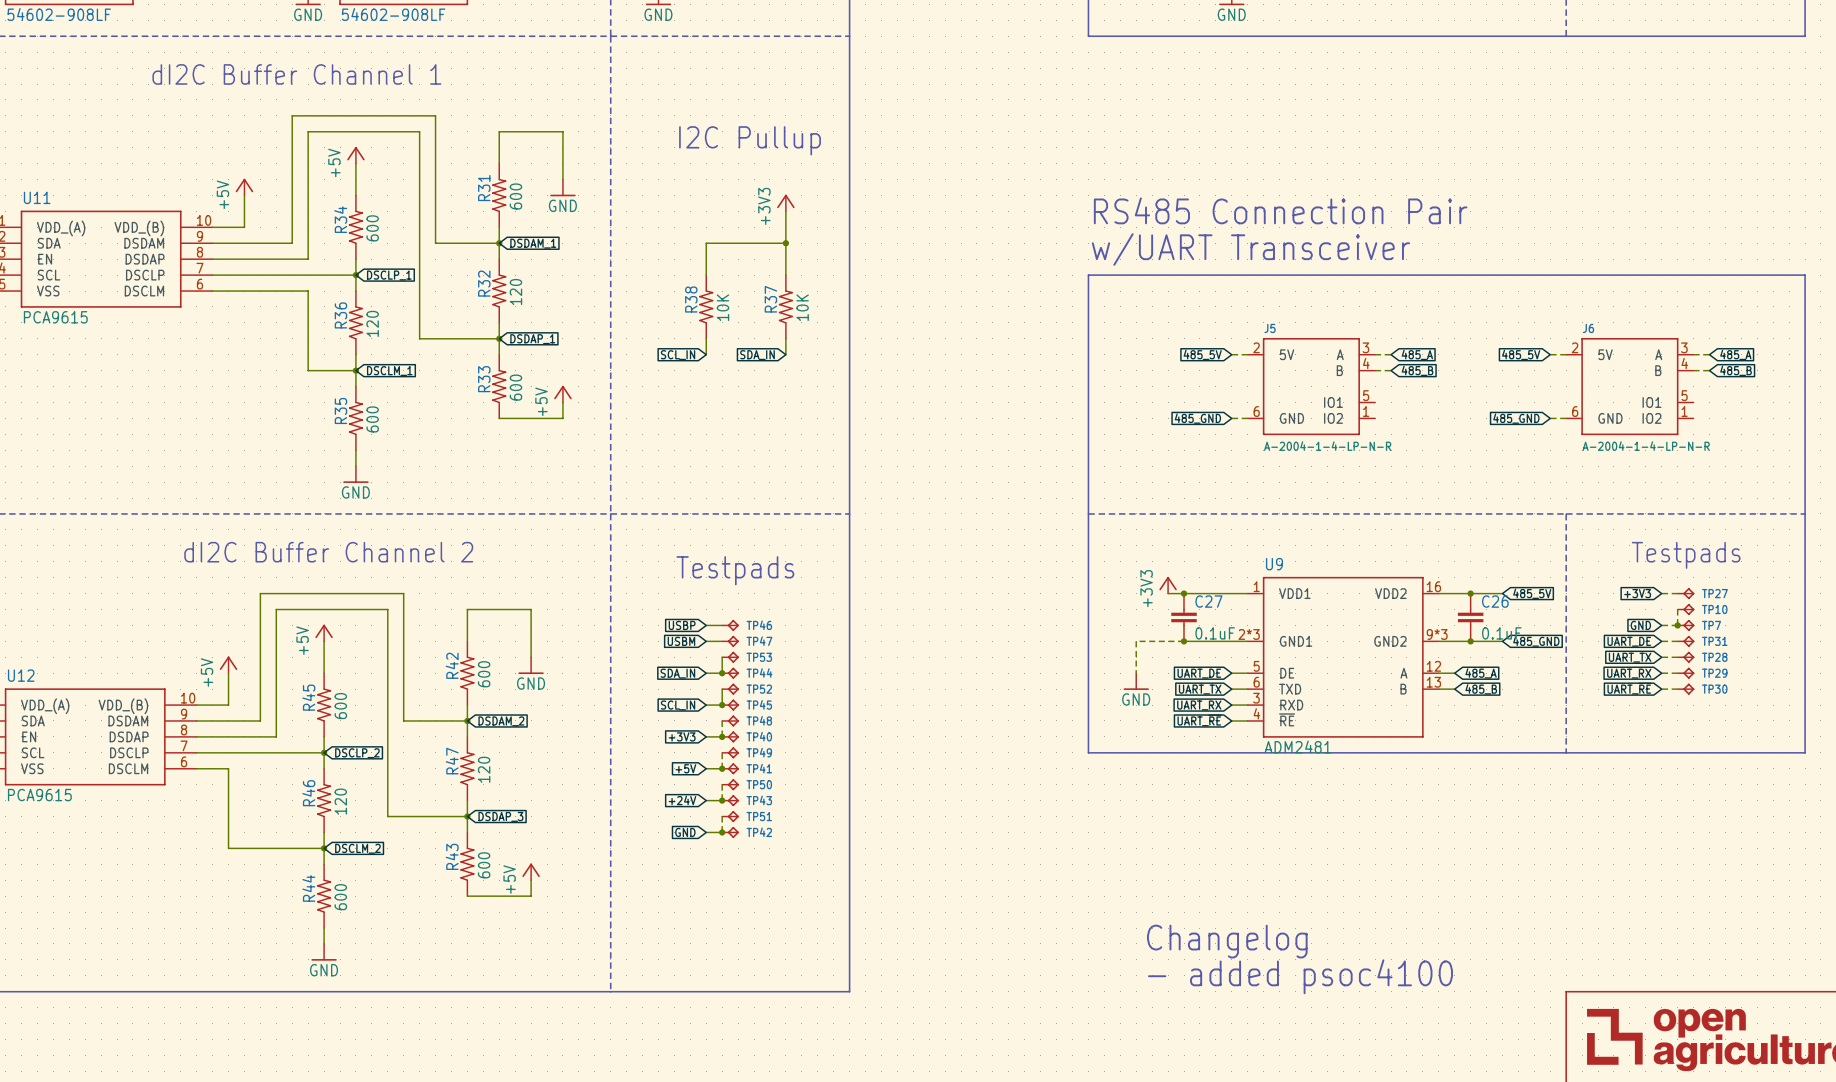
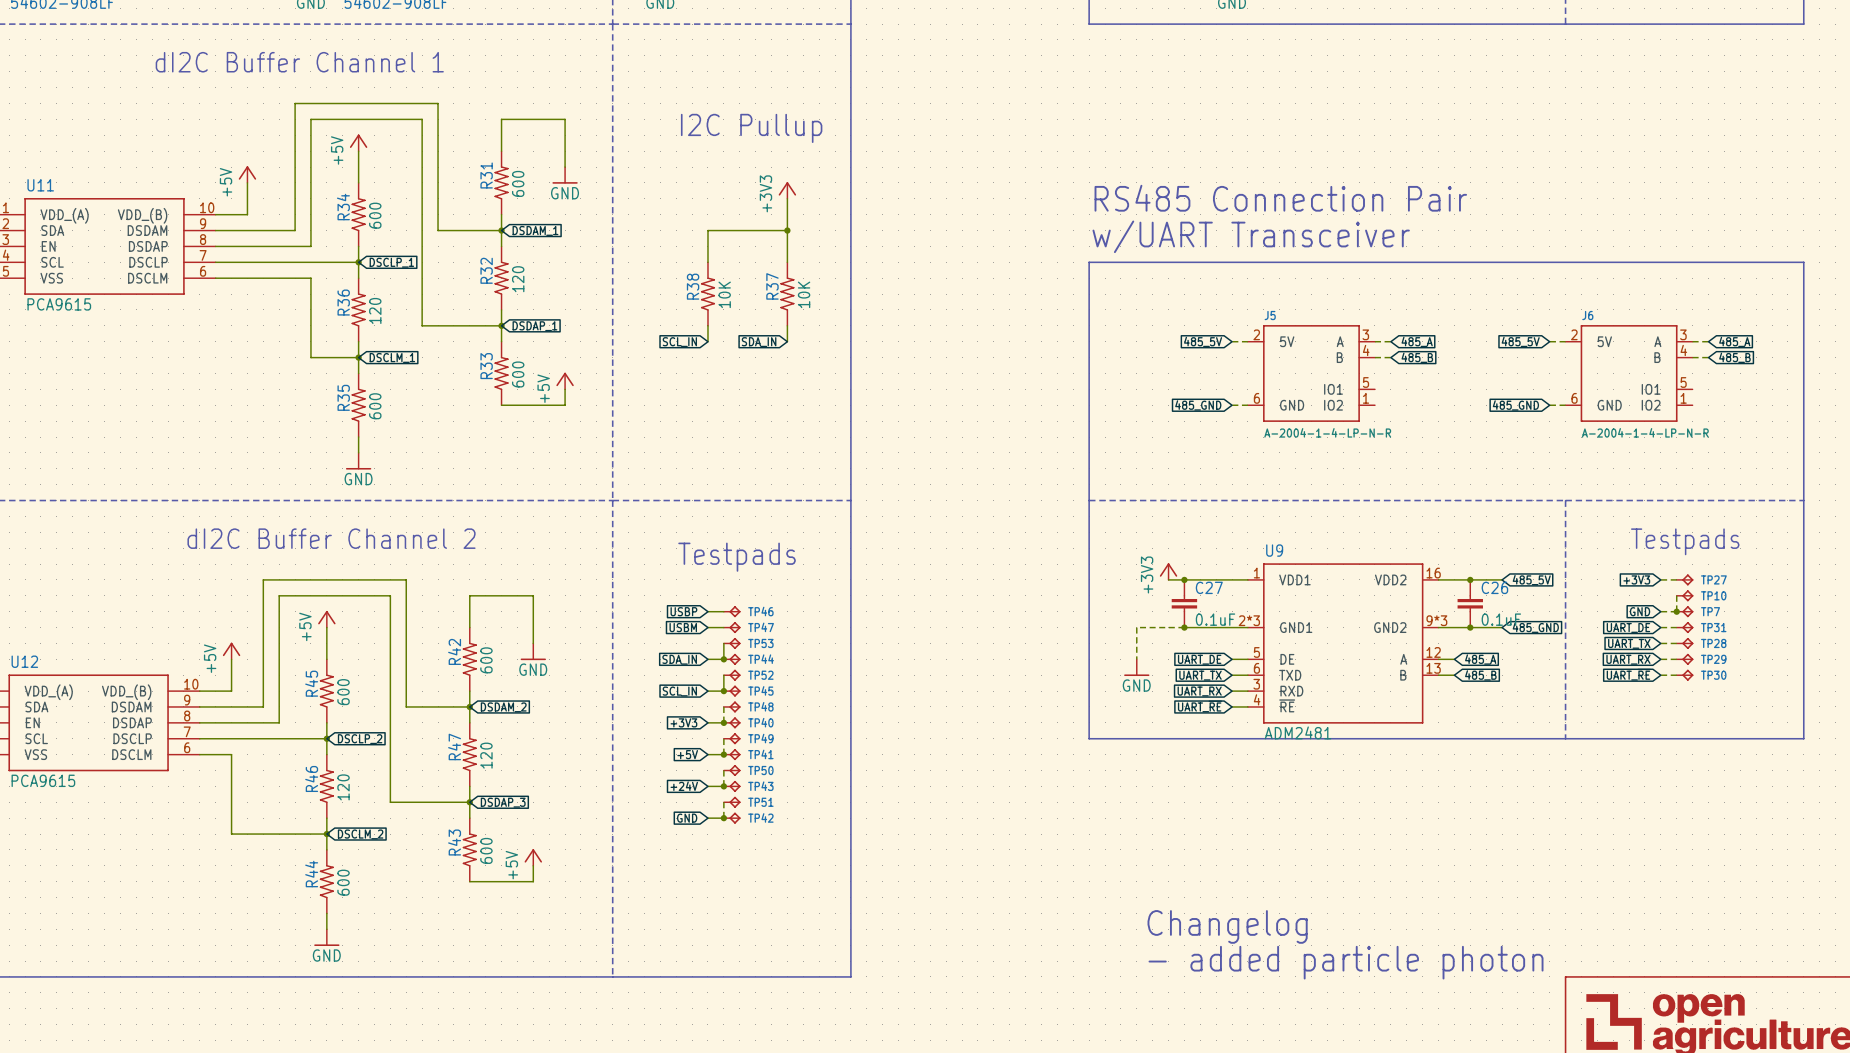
text: - added psoc4100 (1300, 976) -> - added particle photon (1346, 962)

